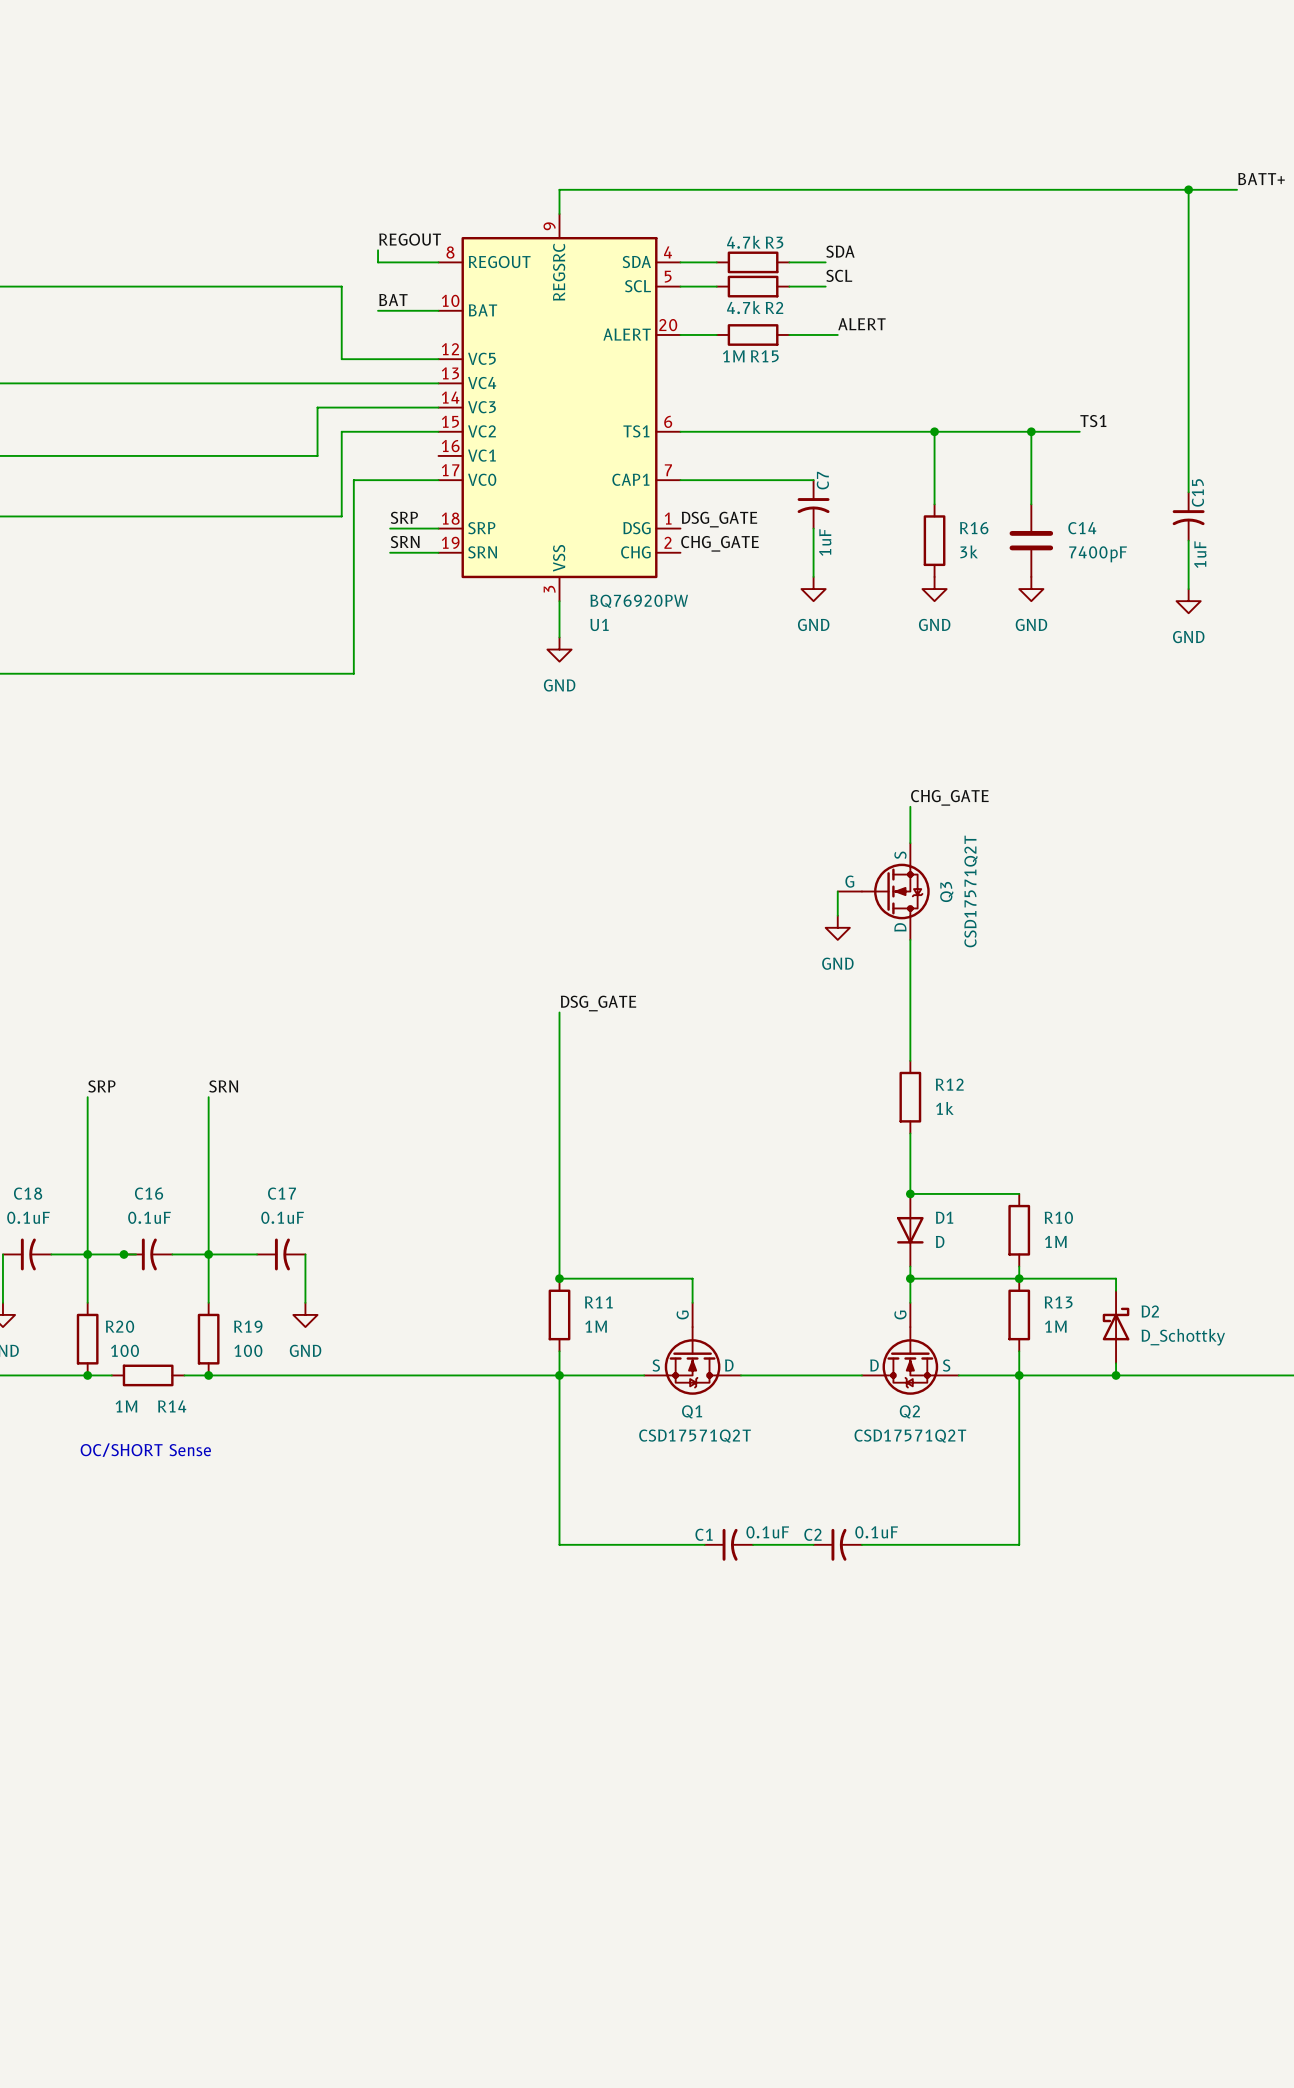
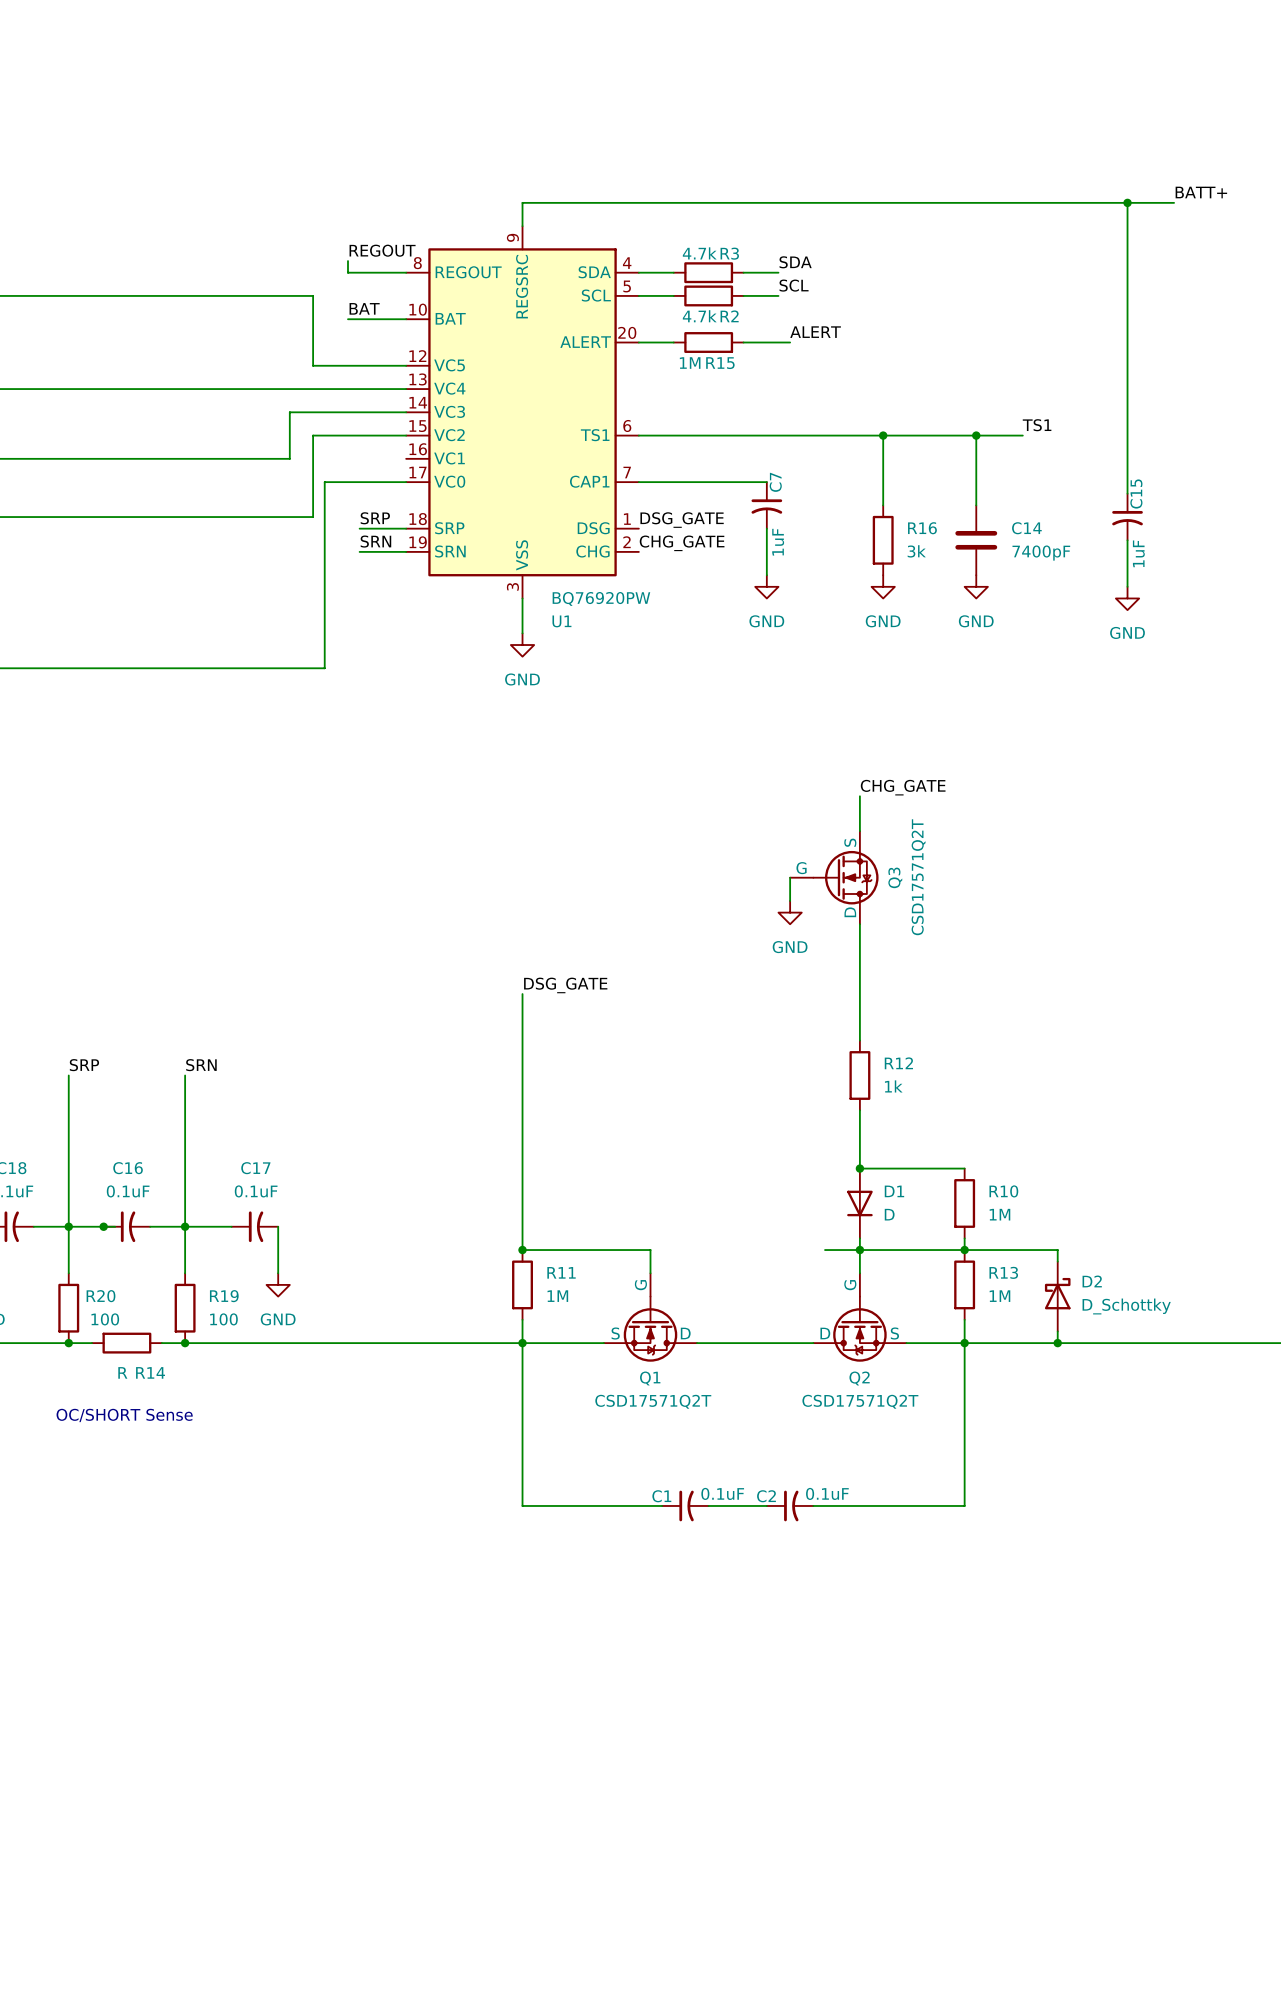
wire: none -> (825, 1250) (859, 1250)
R14 value: 1M (126, 1406) -> R (122, 1372)

